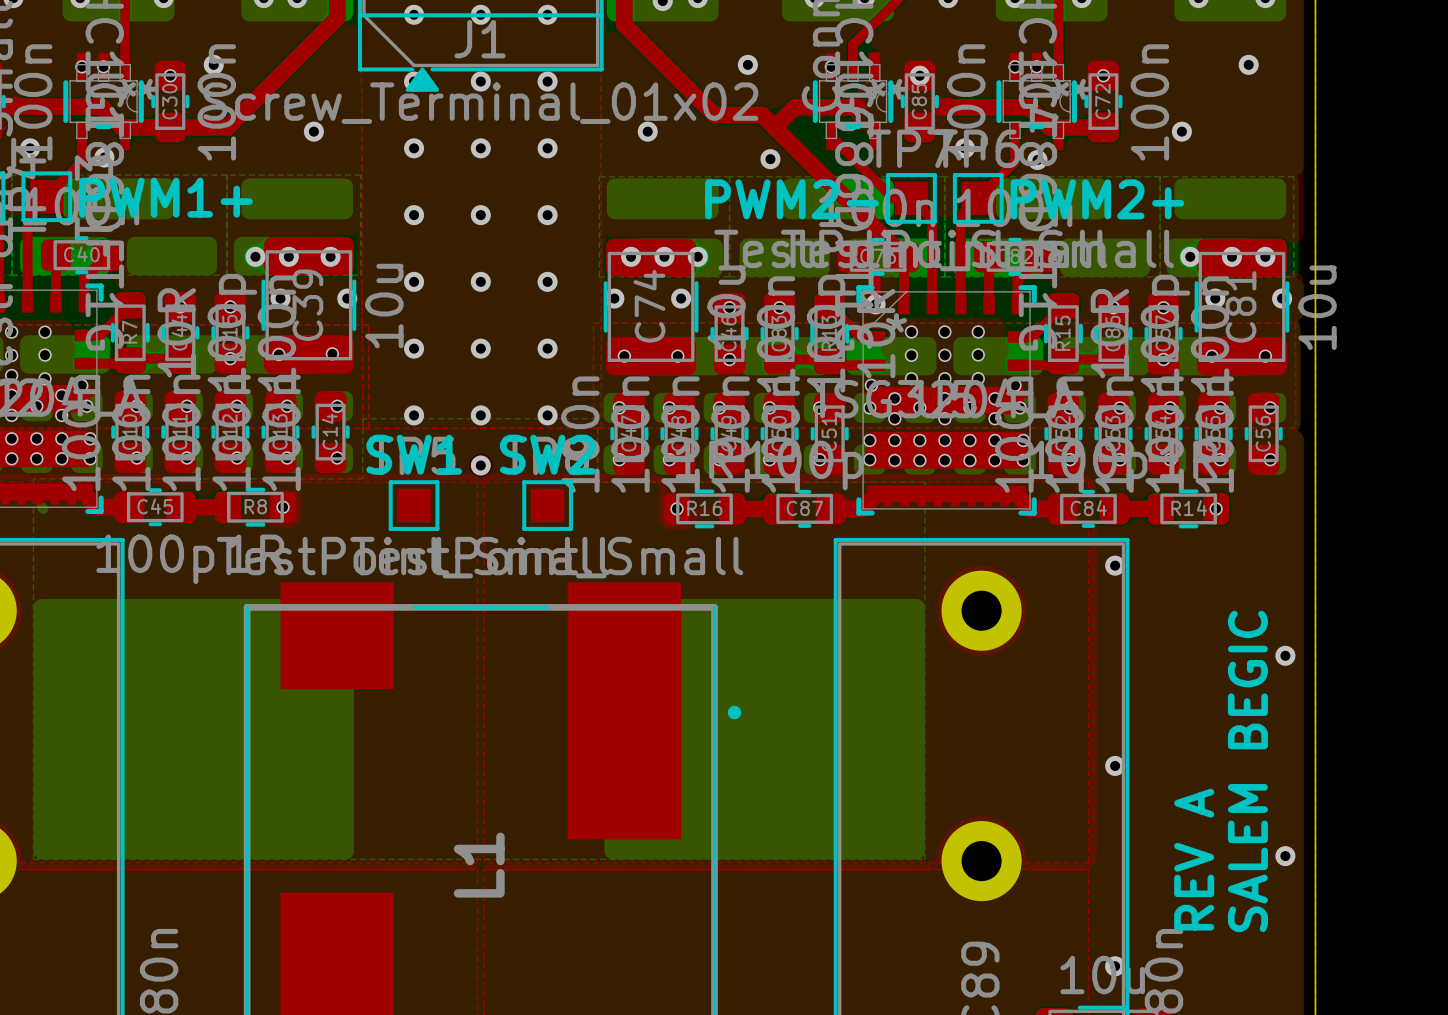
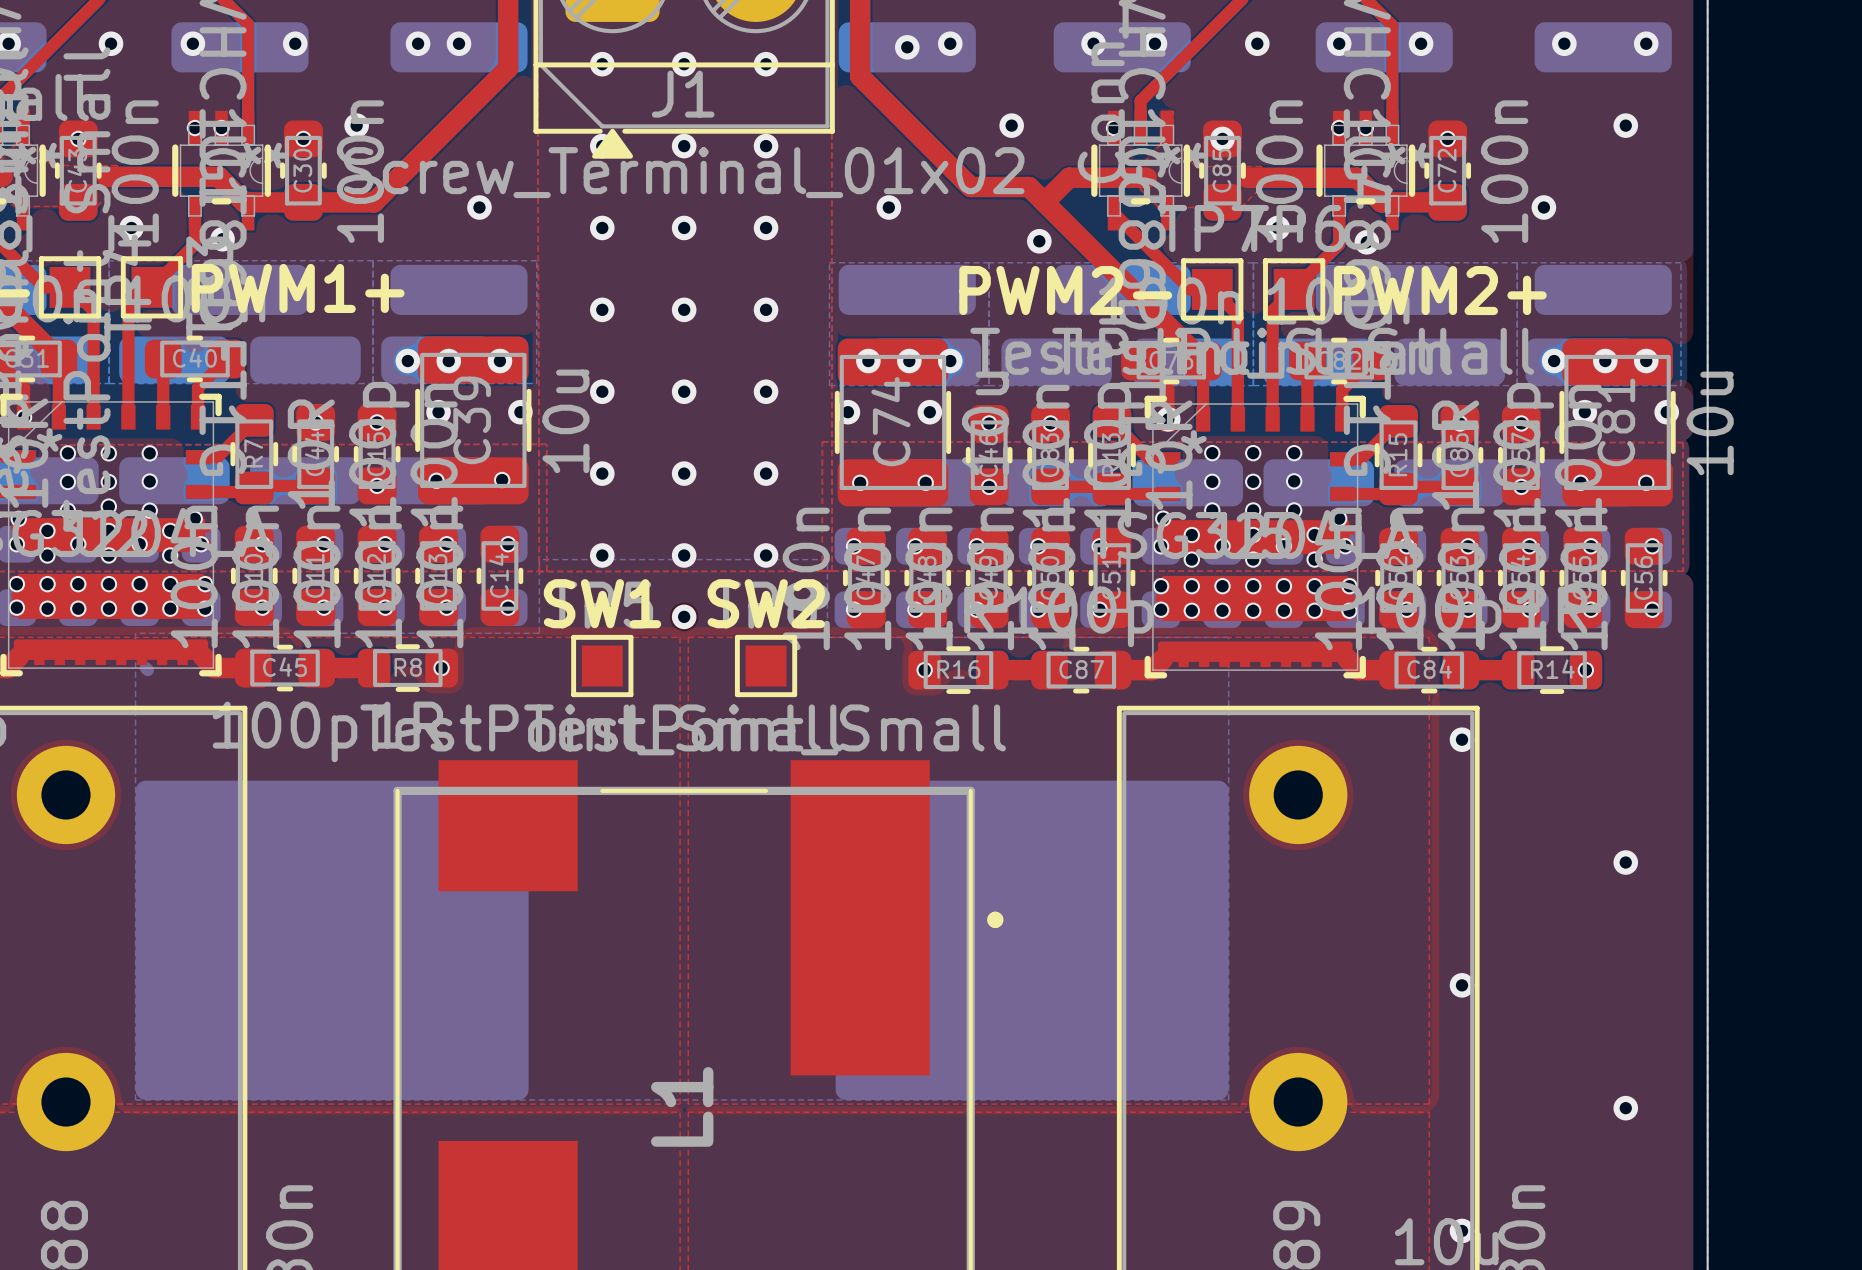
via position: (1285, 655) -> (1625, 862)
text: SALEM BEGIC (1247, 771) -> none
via position: (1285, 856) -> (1625, 1108)
text: REV A (1194, 859) -> none

